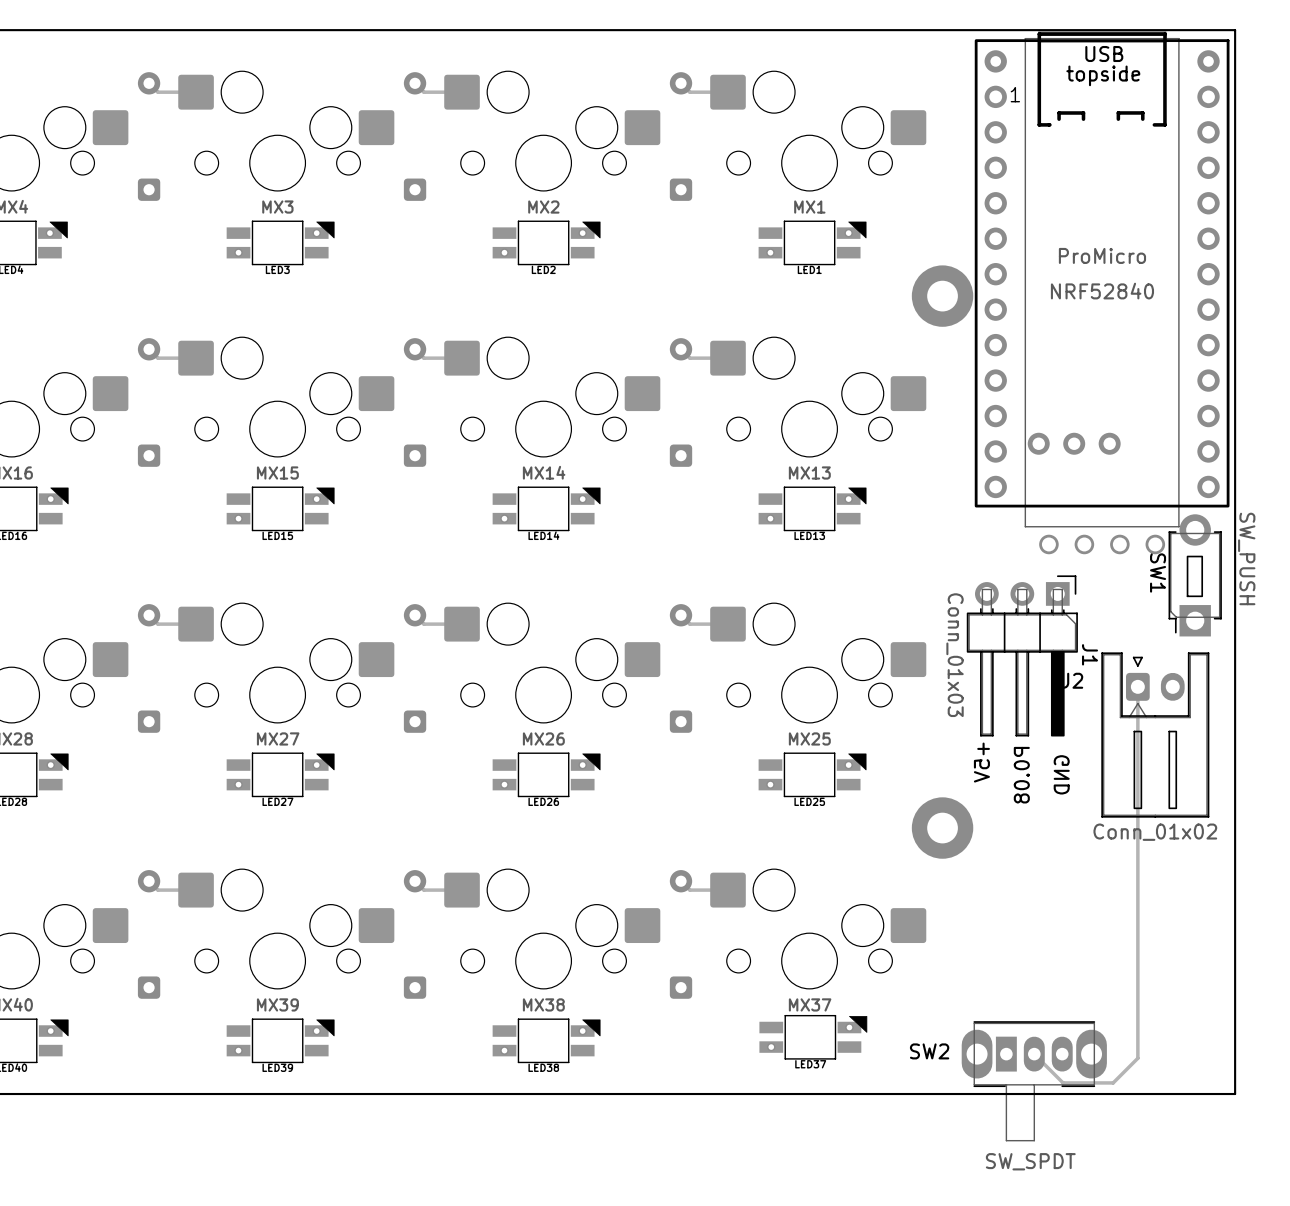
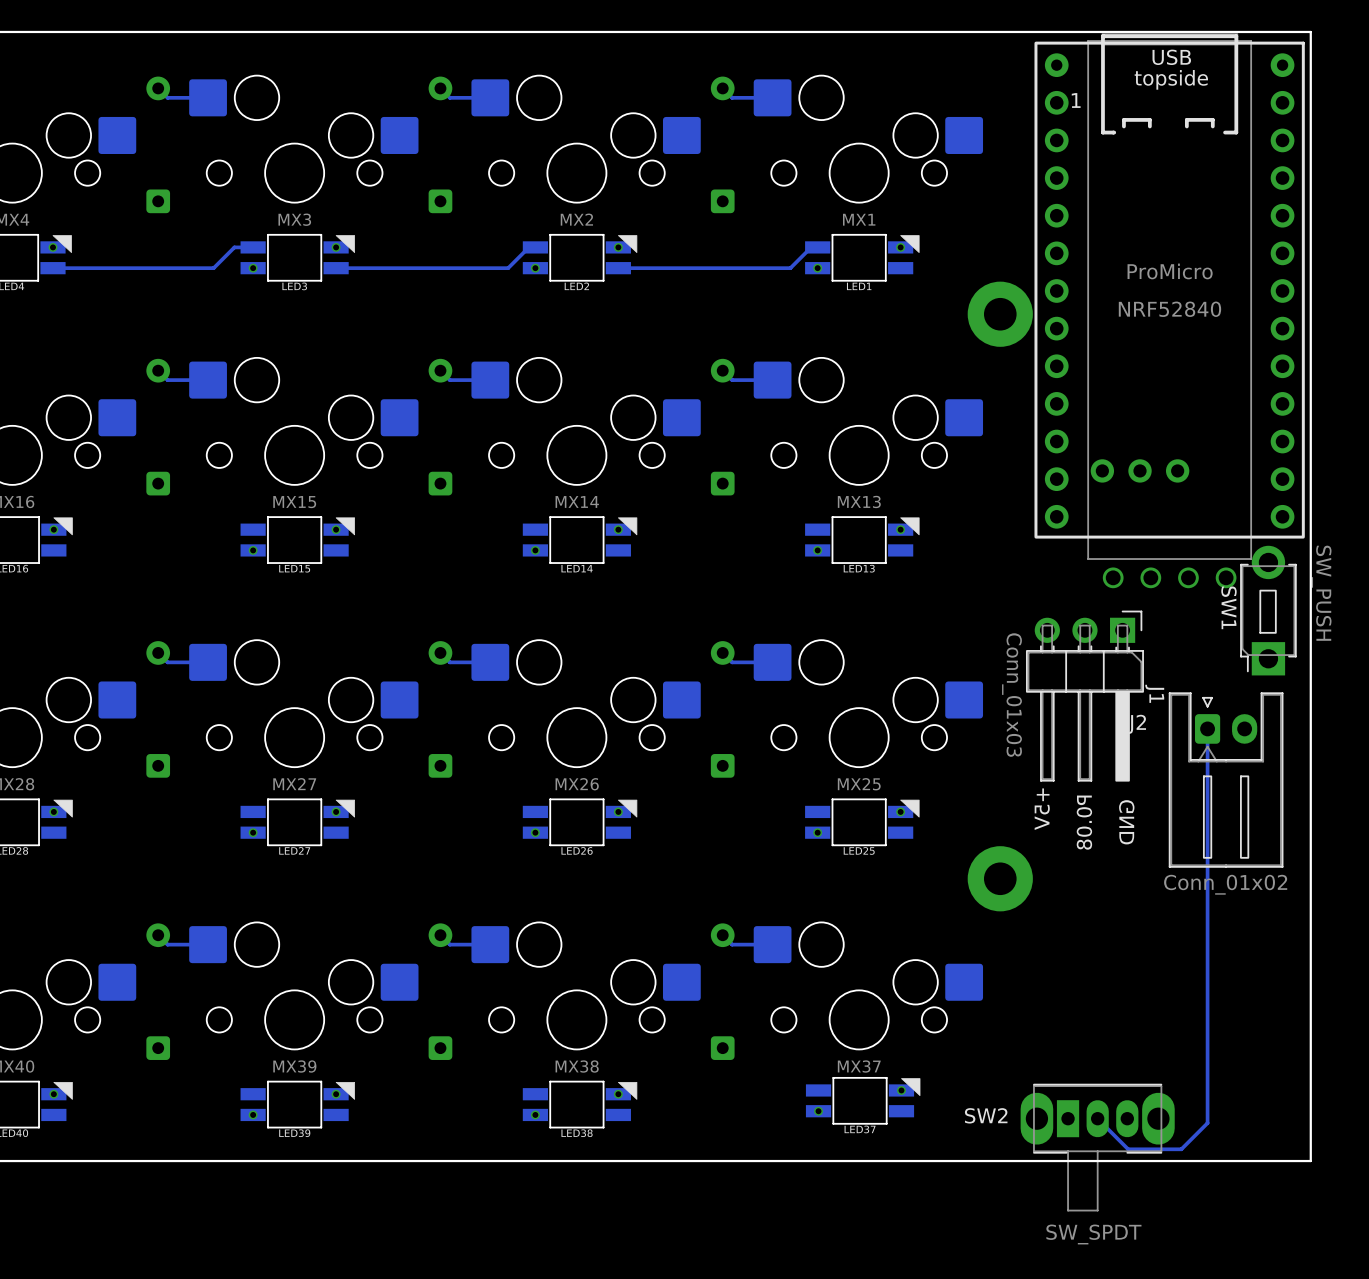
track: none -> (253, 247) (234, 247) (213, 268) (53, 268)
track: none -> (535, 247) (528, 247) (508, 268) (336, 268)
track: none -> (817, 247) (811, 247) (790, 268) (618, 268)

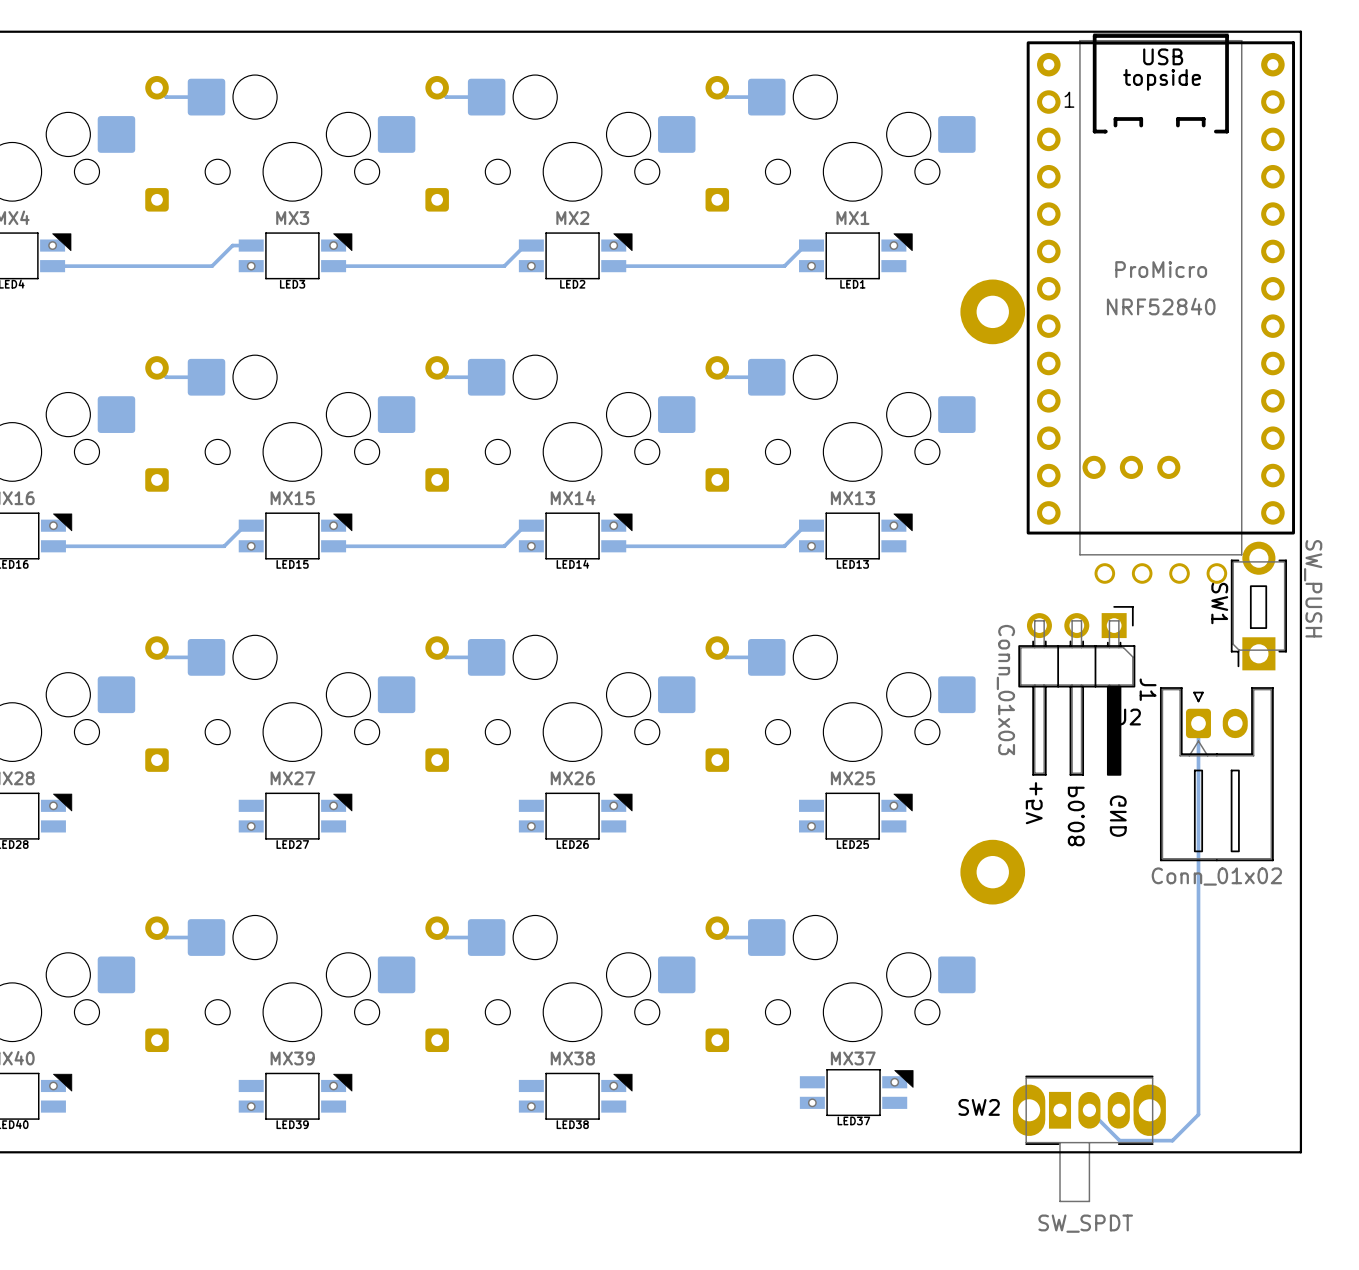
track: none -> (251, 525) (244, 525) (224, 546) (53, 546)
track: none -> (531, 525) (524, 525) (504, 546) (333, 546)
track: none -> (811, 525) (805, 525) (784, 546) (613, 546)

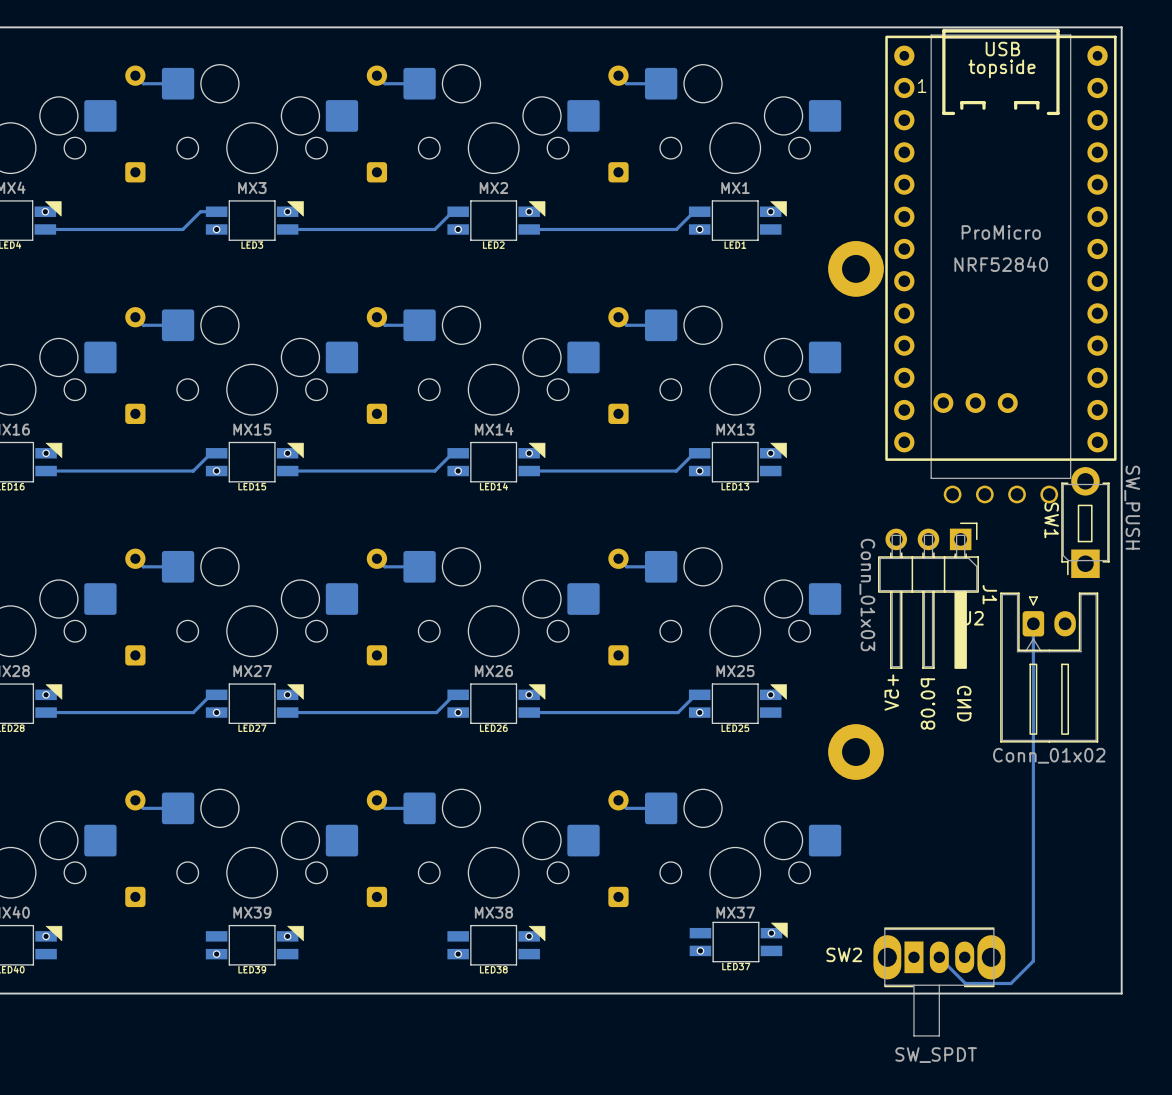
track: none -> (216, 694) (211, 694) (193, 712) (46, 712)
track: none -> (458, 694) (454, 694) (436, 712) (287, 712)
track: none -> (699, 694) (695, 694) (678, 712) (529, 712)

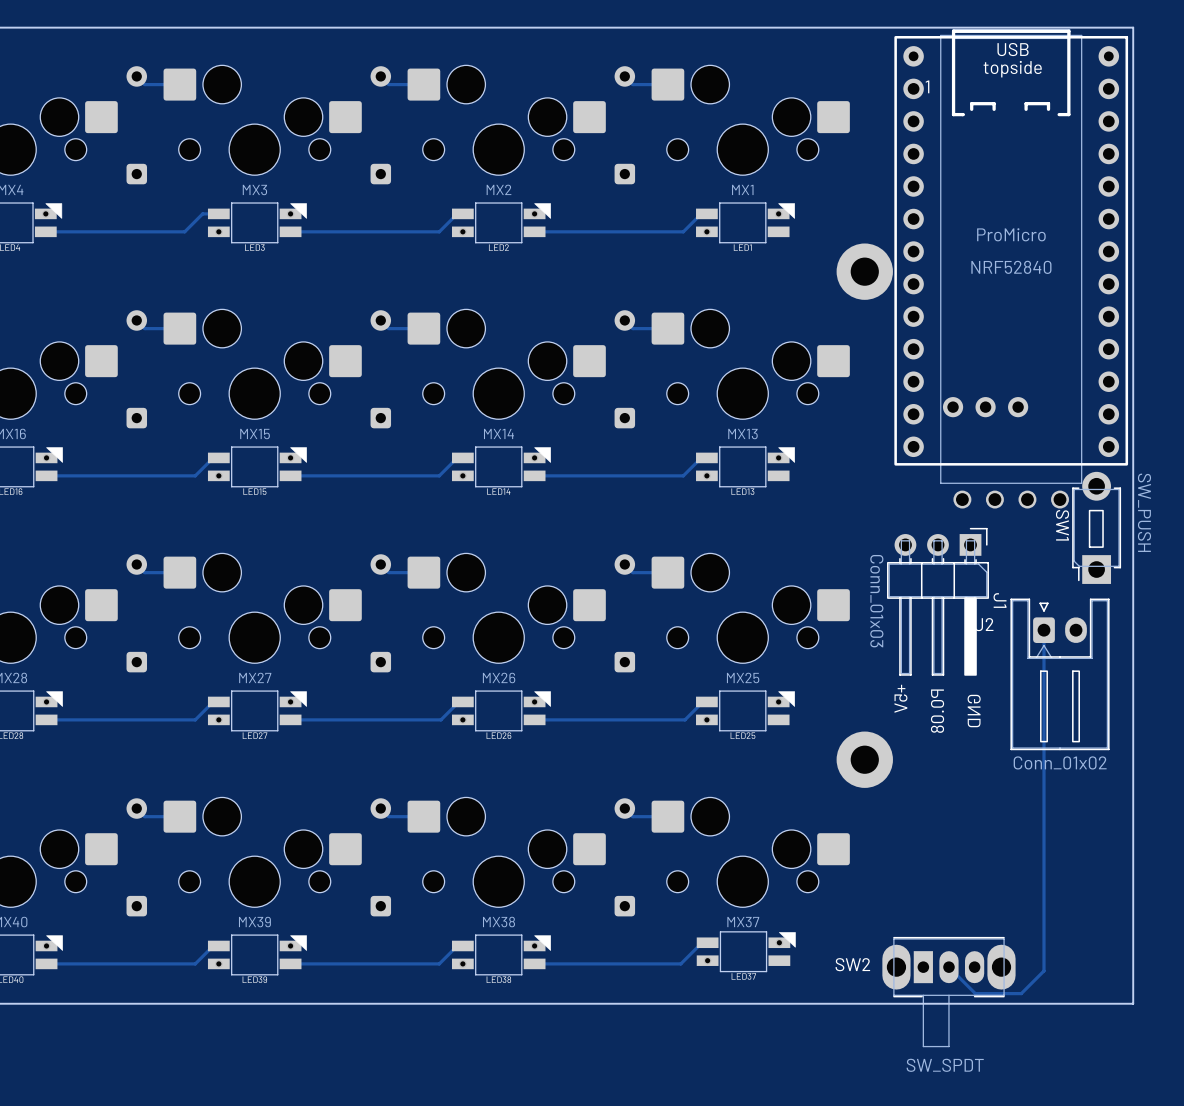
track: none -> (707, 942) (702, 942) (680, 963) (534, 963)
track: none -> (218, 945) (213, 945) (195, 963) (46, 963)
track: none -> (462, 945) (457, 945) (439, 963) (290, 963)

